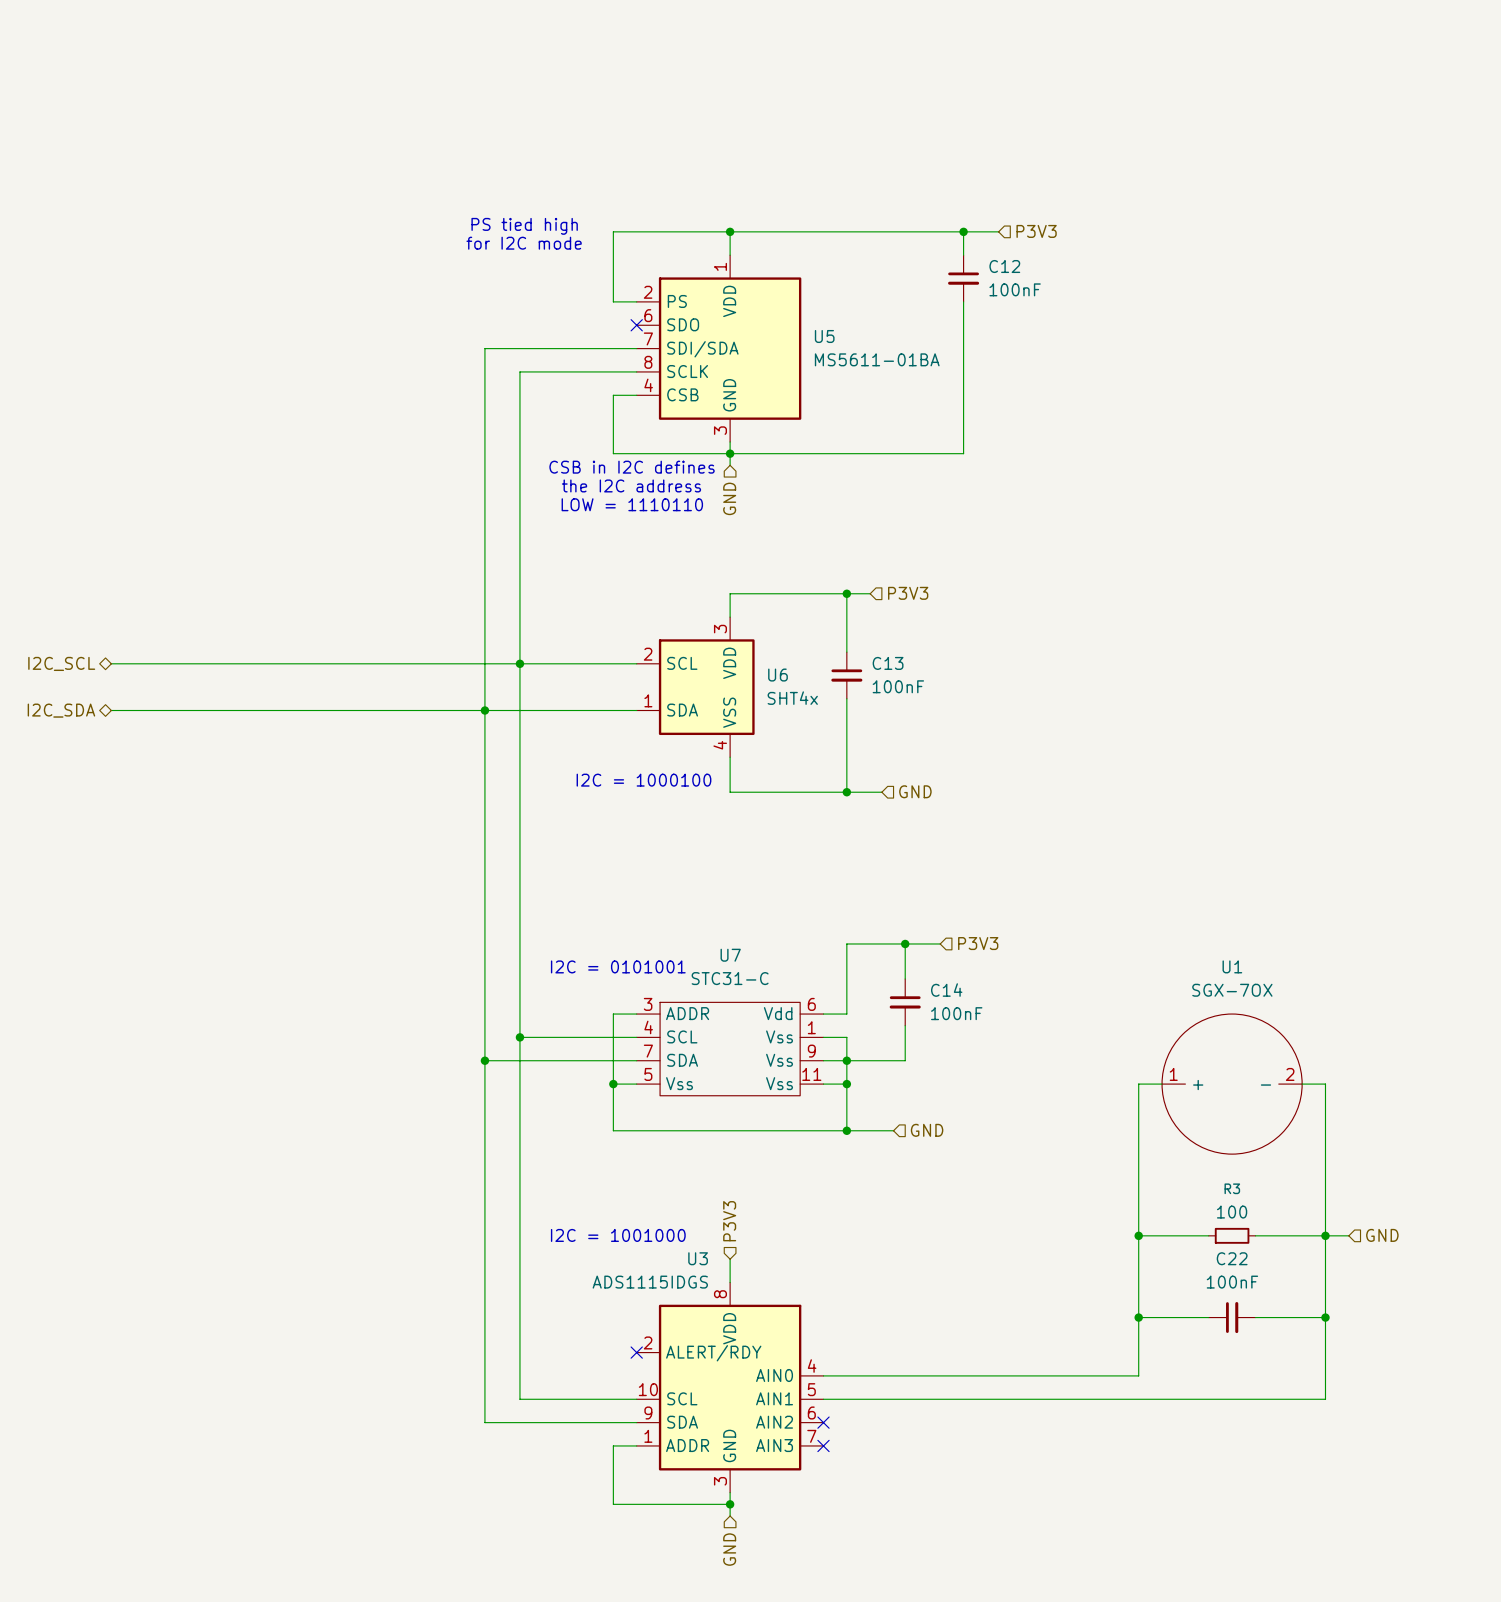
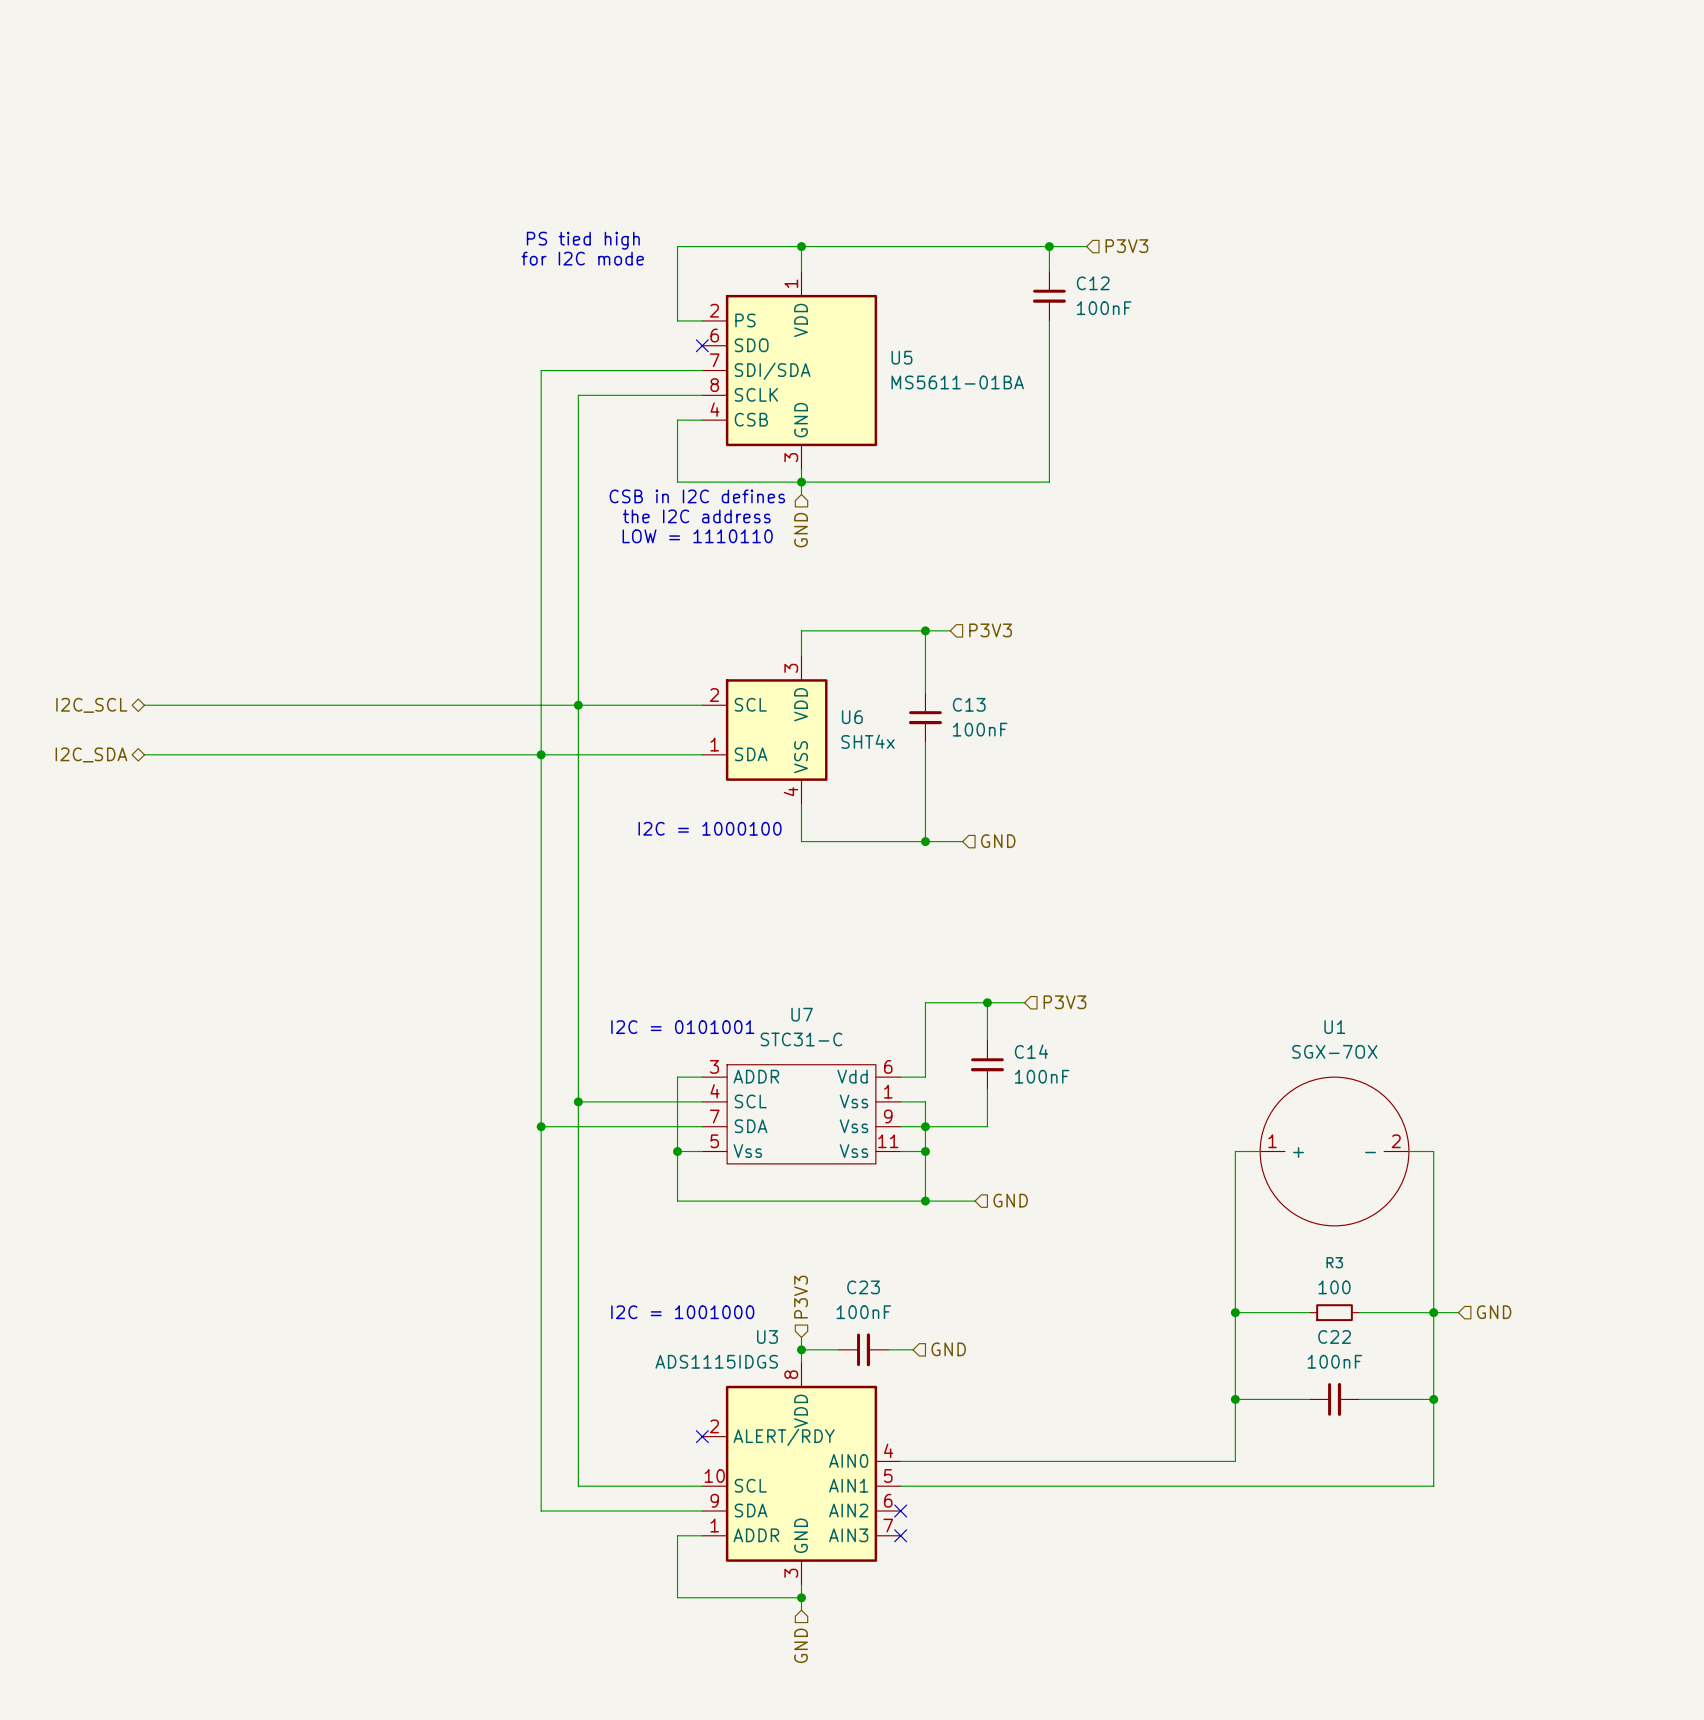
wire: none -> (801, 1349) (838, 1349)
junction: none -> (801, 1349)
C23: none -> 100nF (863, 1349)
wire: none -> (888, 1349) (913, 1349)
hierarchical label: none -> GND (948, 1349)

